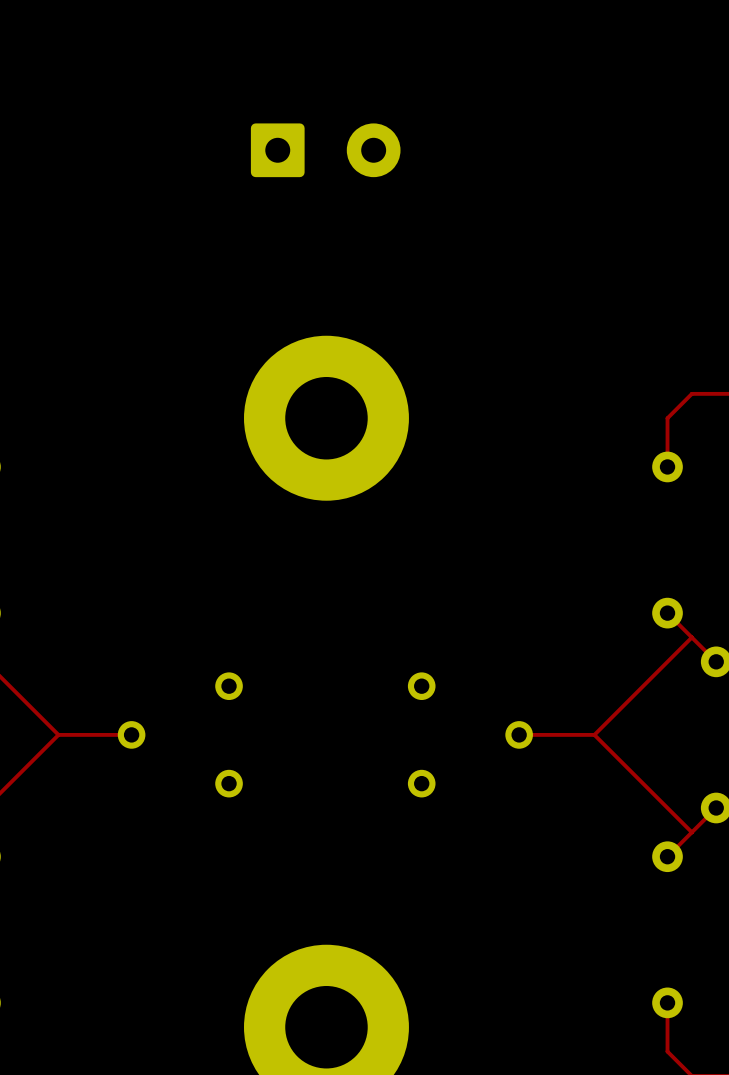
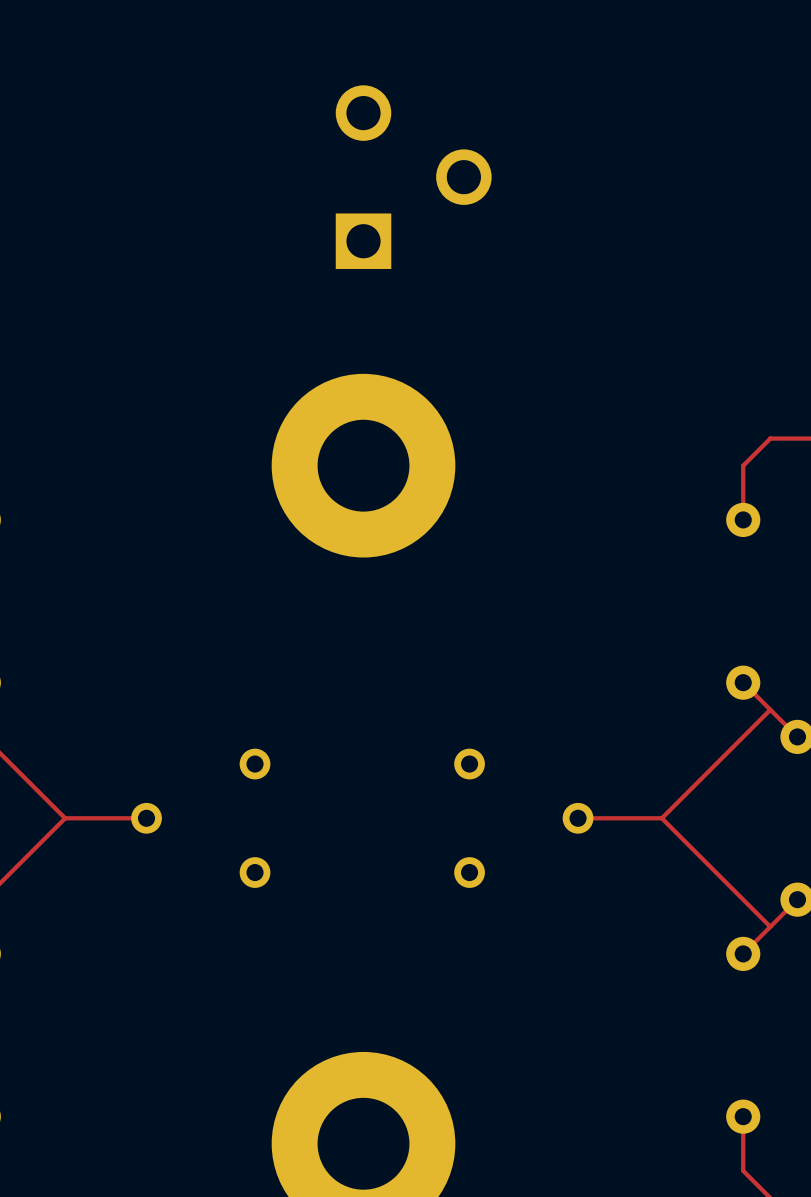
part: (325, 150) -> none
part: none -> (413, 177)

